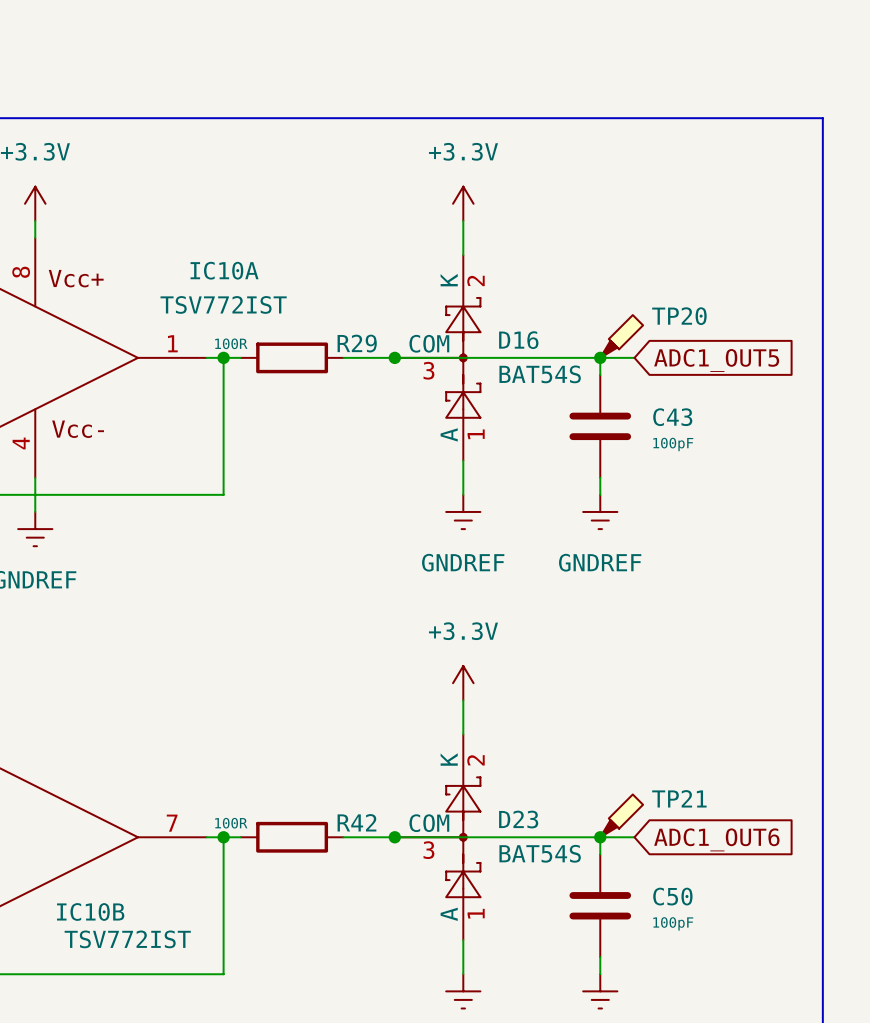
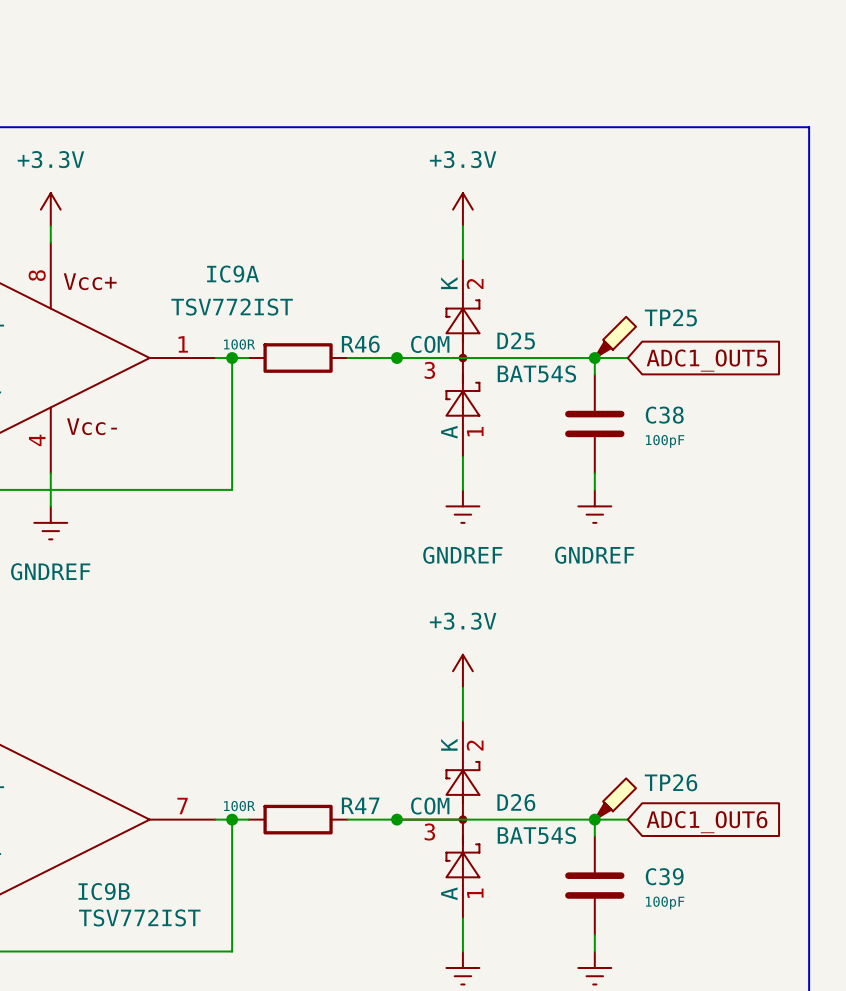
IC10A name: IC10A (224, 270) -> IC9A (233, 274)
TP20 name: TP20 (679, 316) -> TP25 (670, 317)
D16 name: D16 (518, 340) -> D25 (516, 340)
R29 name: R29 (357, 343) -> R46 (360, 344)
C43 name: C43 (672, 417) -> C38 (664, 415)
TP21 name: TP21 (679, 798) -> TP26 (671, 782)
D23 name: D23 (518, 819) -> D26 (516, 802)
R42 name: R42 (356, 822) -> R47 (360, 805)
C50 name: C50 (672, 896) -> C39 (664, 876)
IC10B name: IC10B (90, 911) -> IC9B (104, 891)

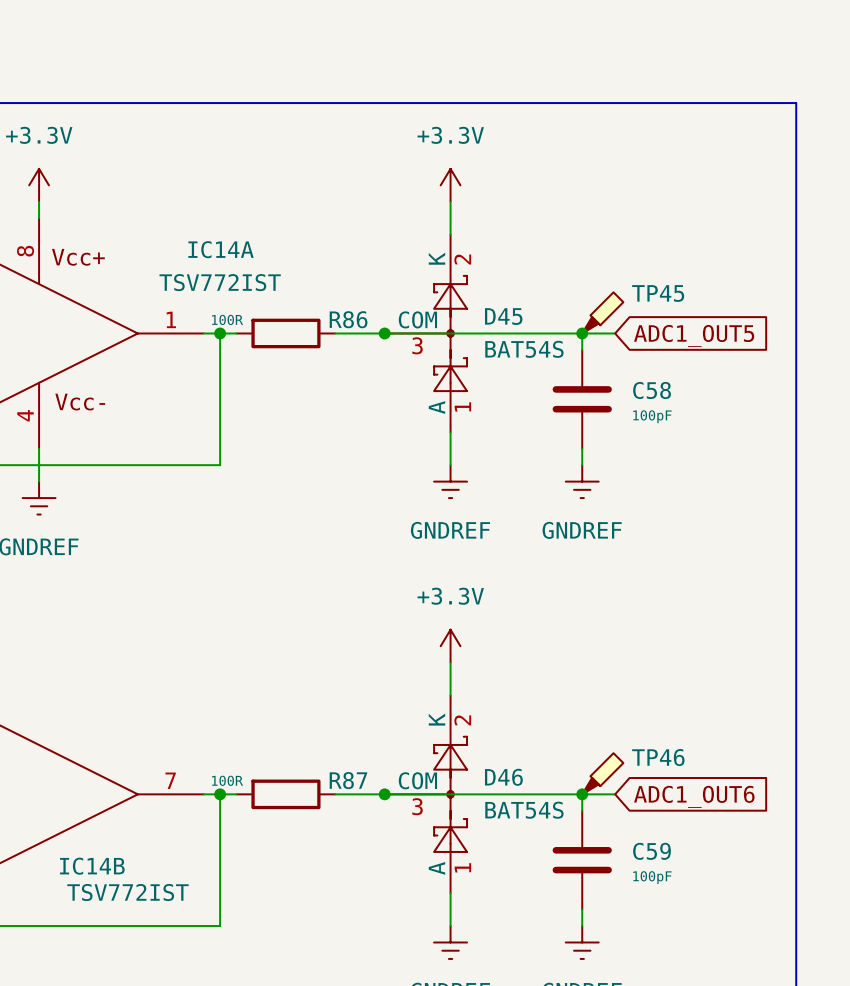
IC9A name: IC9A (233, 274) -> IC14A (221, 249)
TP25 name: TP25 (670, 317) -> TP45 (658, 293)
D25 name: D25 (516, 340) -> D45 (503, 316)
R46 name: R46 (360, 344) -> R86 (348, 319)
C38 name: C38 (664, 415) -> C58 (652, 390)
TP26 name: TP26 (671, 782) -> TP46 (658, 757)
D26 name: D26 (516, 802) -> D46 (503, 777)
R47 name: R47 (360, 805) -> R87 (348, 780)
C39 name: C39 (664, 876) -> C59 (652, 851)
IC9B name: IC9B (104, 891) -> IC14B (92, 866)

